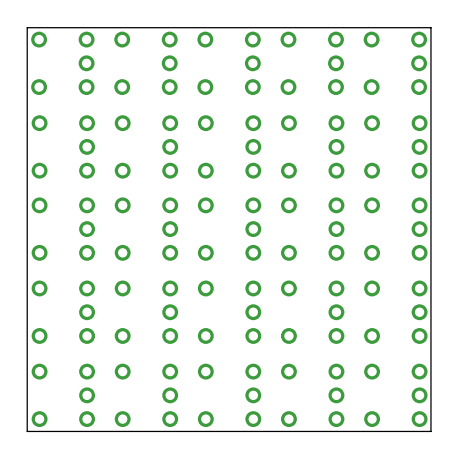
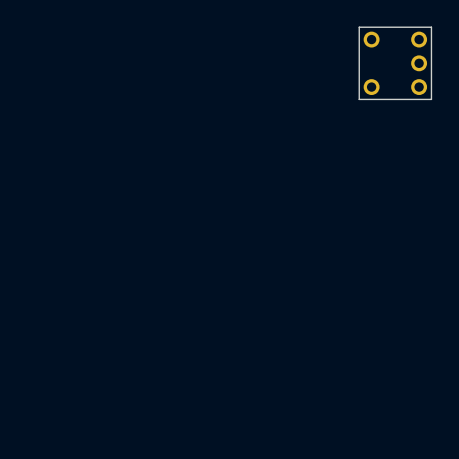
board edge: (430, 27) (27, 27) (27, 431) (430, 431) (430, 27) -> none
board edge: none -> (431, 27) (359, 27) (359, 99) (431, 99) (431, 27)
part: (39, 39) -> none
part: (86, 39) -> none
part: (122, 39) -> none
part: (169, 39) -> none
part: (205, 39) -> none
part: (252, 39) -> none
part: (288, 39) -> none
part: (335, 39) -> none
part: (86, 63) -> none
part: (169, 63) -> none
part: (252, 63) -> none
part: (335, 63) -> none
part: (39, 87) -> none
part: (86, 87) -> none
part: (122, 87) -> none
part: (169, 87) -> none
part: (205, 87) -> none
part: (252, 87) -> none
part: (288, 87) -> none
part: (335, 87) -> none
part: (39, 123) -> none
part: (87, 123) -> none
part: (122, 123) -> none
part: (170, 123) -> none
part: (205, 123) -> none
part: (253, 123) -> none
part: (288, 123) -> none
part: (336, 123) -> none
part: (372, 123) -> none
part: (419, 123) -> none
part: (87, 146) -> none
part: (170, 146) -> none
part: (253, 146) -> none
part: (336, 146) -> none
part: (419, 146) -> none
part: (39, 170) -> none
part: (87, 170) -> none
part: (122, 170) -> none
part: (170, 170) -> none
part: (205, 170) -> none
part: (253, 170) -> none
part: (288, 170) -> none
part: (336, 170) -> none
part: (372, 170) -> none
part: (419, 170) -> none
part: (39, 205) -> none
part: (87, 205) -> none
part: (122, 205) -> none
part: (170, 205) -> none
part: (205, 205) -> none
part: (253, 205) -> none
part: (288, 205) -> none
part: (336, 205) -> none
part: (372, 205) -> none
part: (419, 205) -> none
part: (87, 229) -> none
part: (170, 229) -> none
part: (253, 229) -> none
part: (336, 229) -> none
part: (419, 229) -> none
part: (39, 252) -> none
part: (87, 252) -> none
part: (122, 252) -> none
part: (170, 252) -> none
part: (205, 252) -> none
part: (253, 252) -> none
part: (288, 252) -> none
part: (336, 252) -> none
part: (372, 252) -> none
part: (419, 252) -> none
part: (39, 288) -> none
part: (87, 288) -> none
part: (122, 288) -> none
part: (170, 288) -> none
part: (205, 288) -> none
part: (253, 288) -> none
part: (288, 288) -> none
part: (336, 288) -> none
part: (372, 288) -> none
part: (419, 288) -> none
part: (87, 312) -> none
part: (170, 312) -> none
part: (253, 312) -> none
part: (336, 312) -> none
part: (419, 312) -> none
part: (39, 335) -> none
part: (87, 335) -> none
part: (122, 335) -> none
part: (170, 335) -> none
part: (205, 335) -> none
part: (253, 335) -> none
part: (288, 335) -> none
part: (336, 335) -> none
part: (372, 335) -> none
part: (419, 335) -> none
part: (39, 371) -> none
part: (87, 371) -> none
part: (122, 371) -> none
part: (170, 371) -> none
part: (205, 371) -> none
part: (253, 371) -> none
part: (288, 371) -> none
part: (336, 371) -> none
part: (372, 371) -> none
part: (419, 371) -> none
part: (87, 395) -> none
part: (170, 395) -> none
part: (253, 395) -> none
part: (336, 395) -> none
part: (419, 395) -> none
part: (39, 419) -> none
part: (87, 419) -> none
part: (122, 419) -> none
part: (170, 419) -> none
part: (205, 419) -> none
part: (253, 419) -> none
part: (288, 419) -> none
part: (336, 419) -> none
part: (372, 419) -> none
part: (419, 419) -> none

